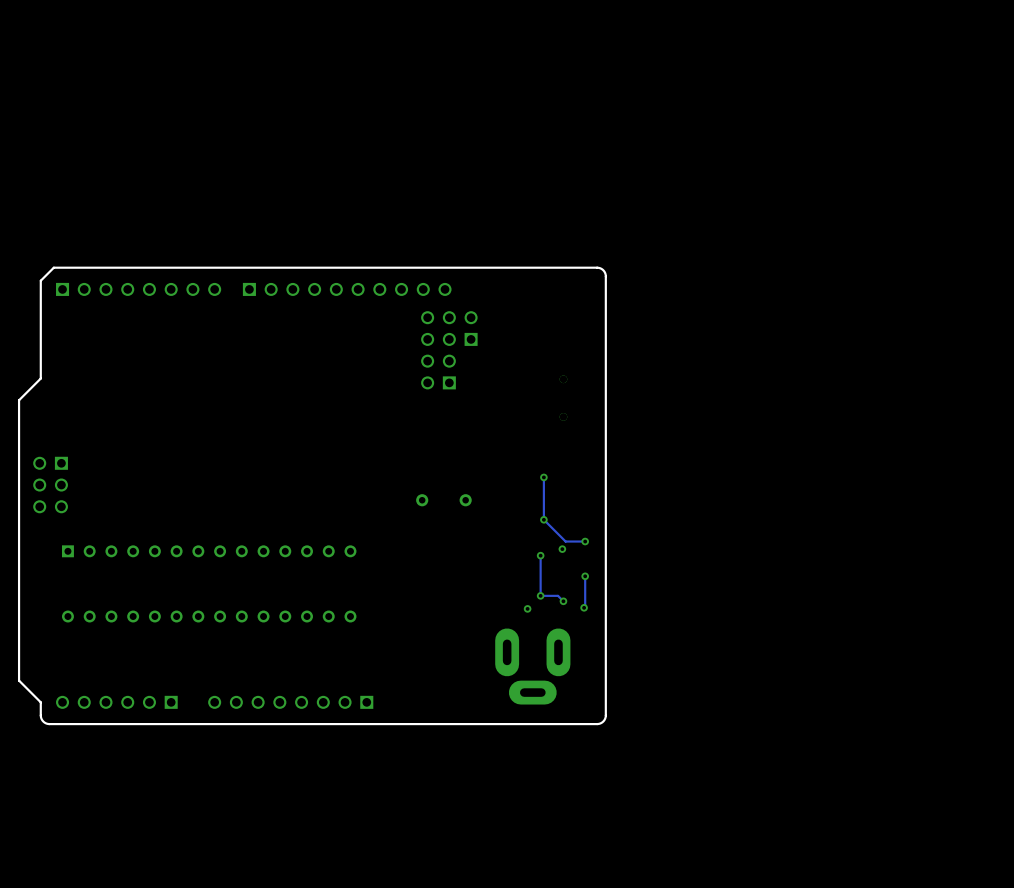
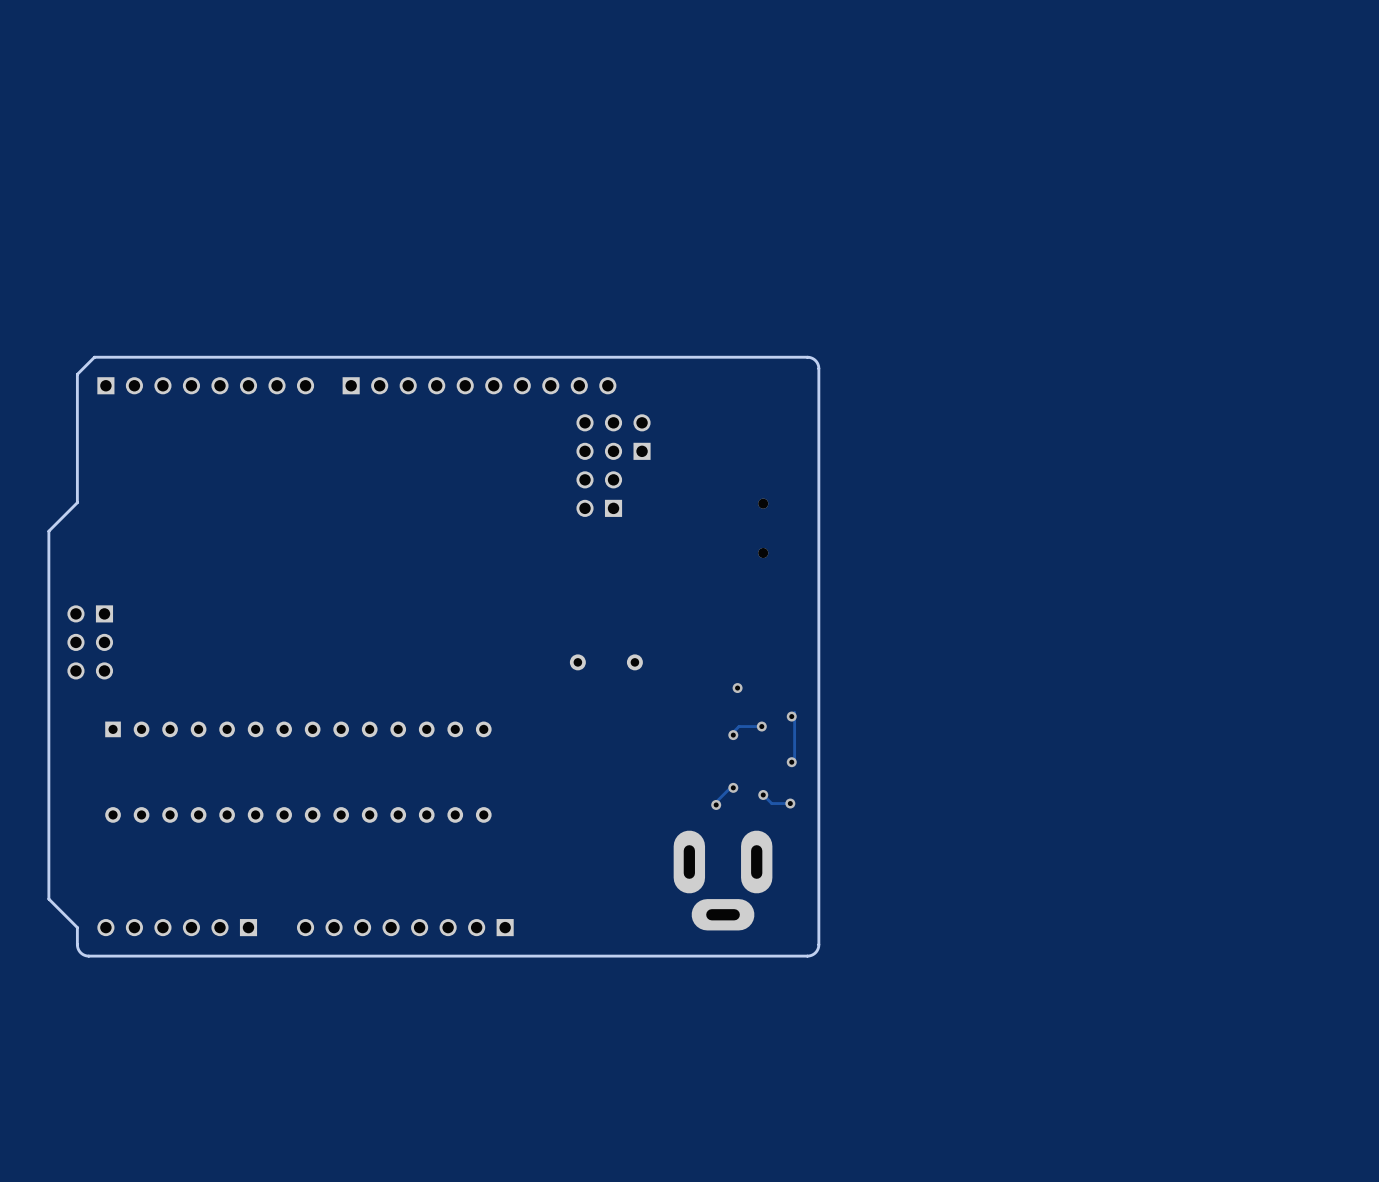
track: (543, 477) (543, 519) (565, 541) (585, 541) -> none
via: (543, 477) -> none
track: none -> (794, 712) (794, 762)
track: none -> (764, 726) (739, 726) (731, 733)
track: (540, 555) (540, 595) (558, 595) (563, 601) -> none
track: (585, 576) (584, 607) -> (763, 794) (771, 803) (790, 803)
track: none -> (731, 786) (714, 803)

